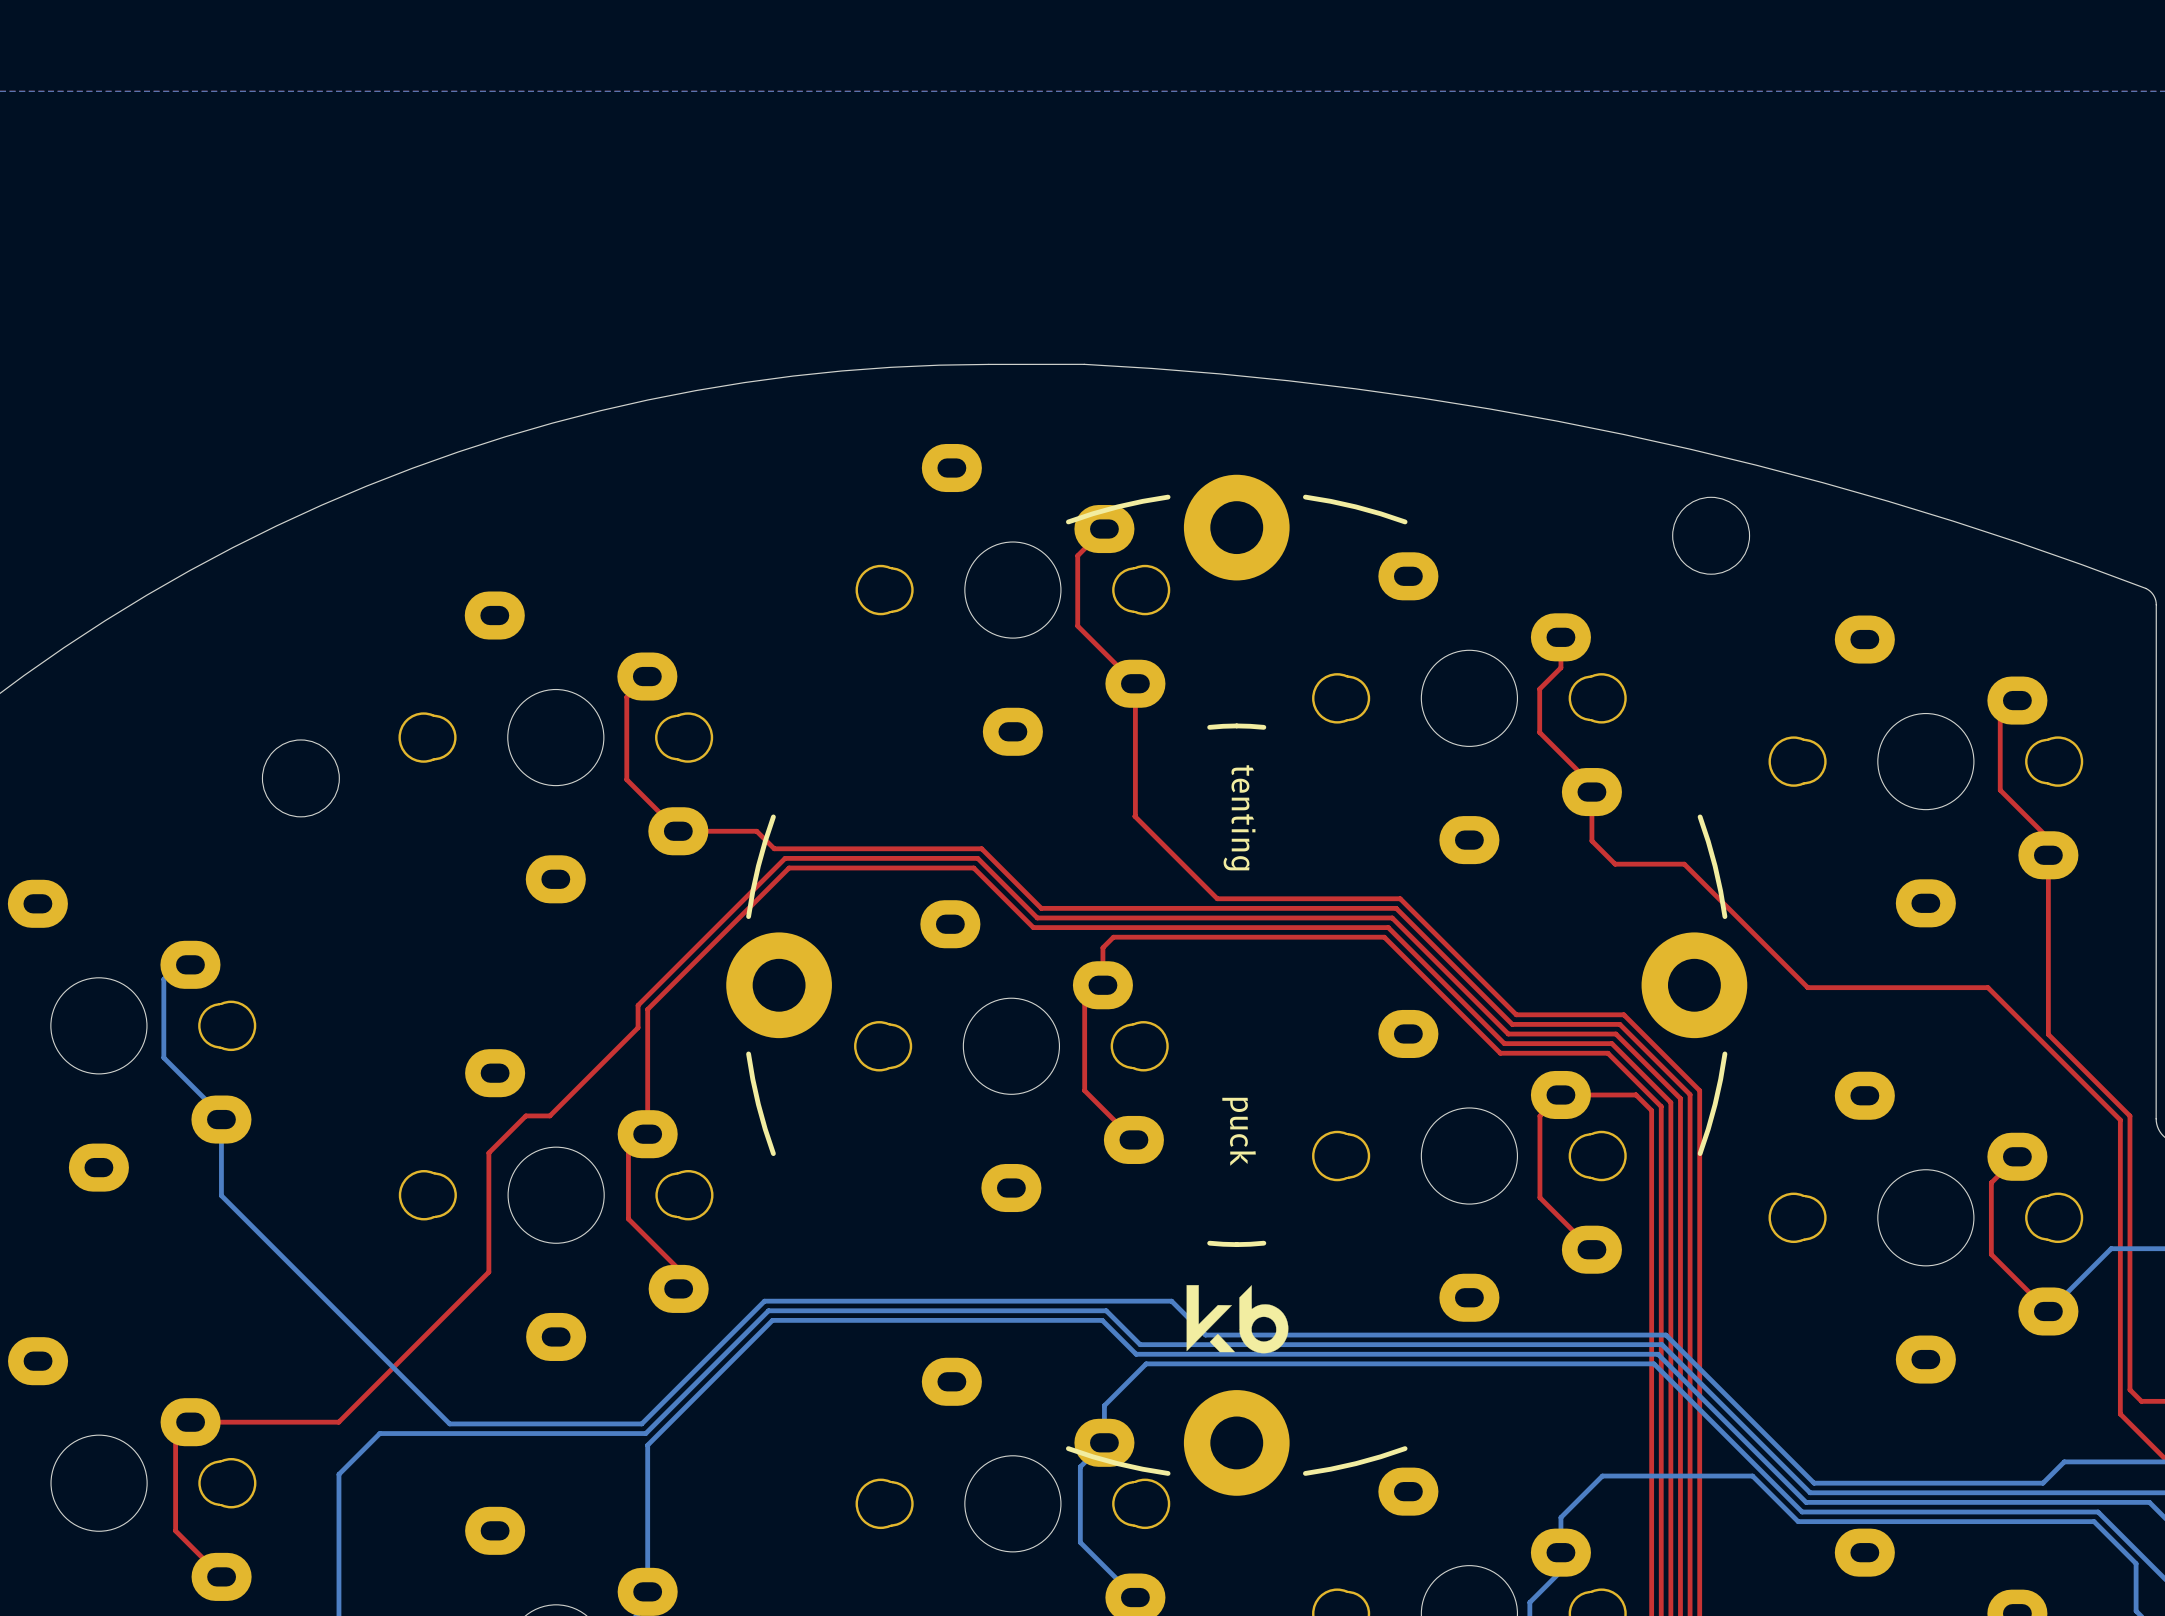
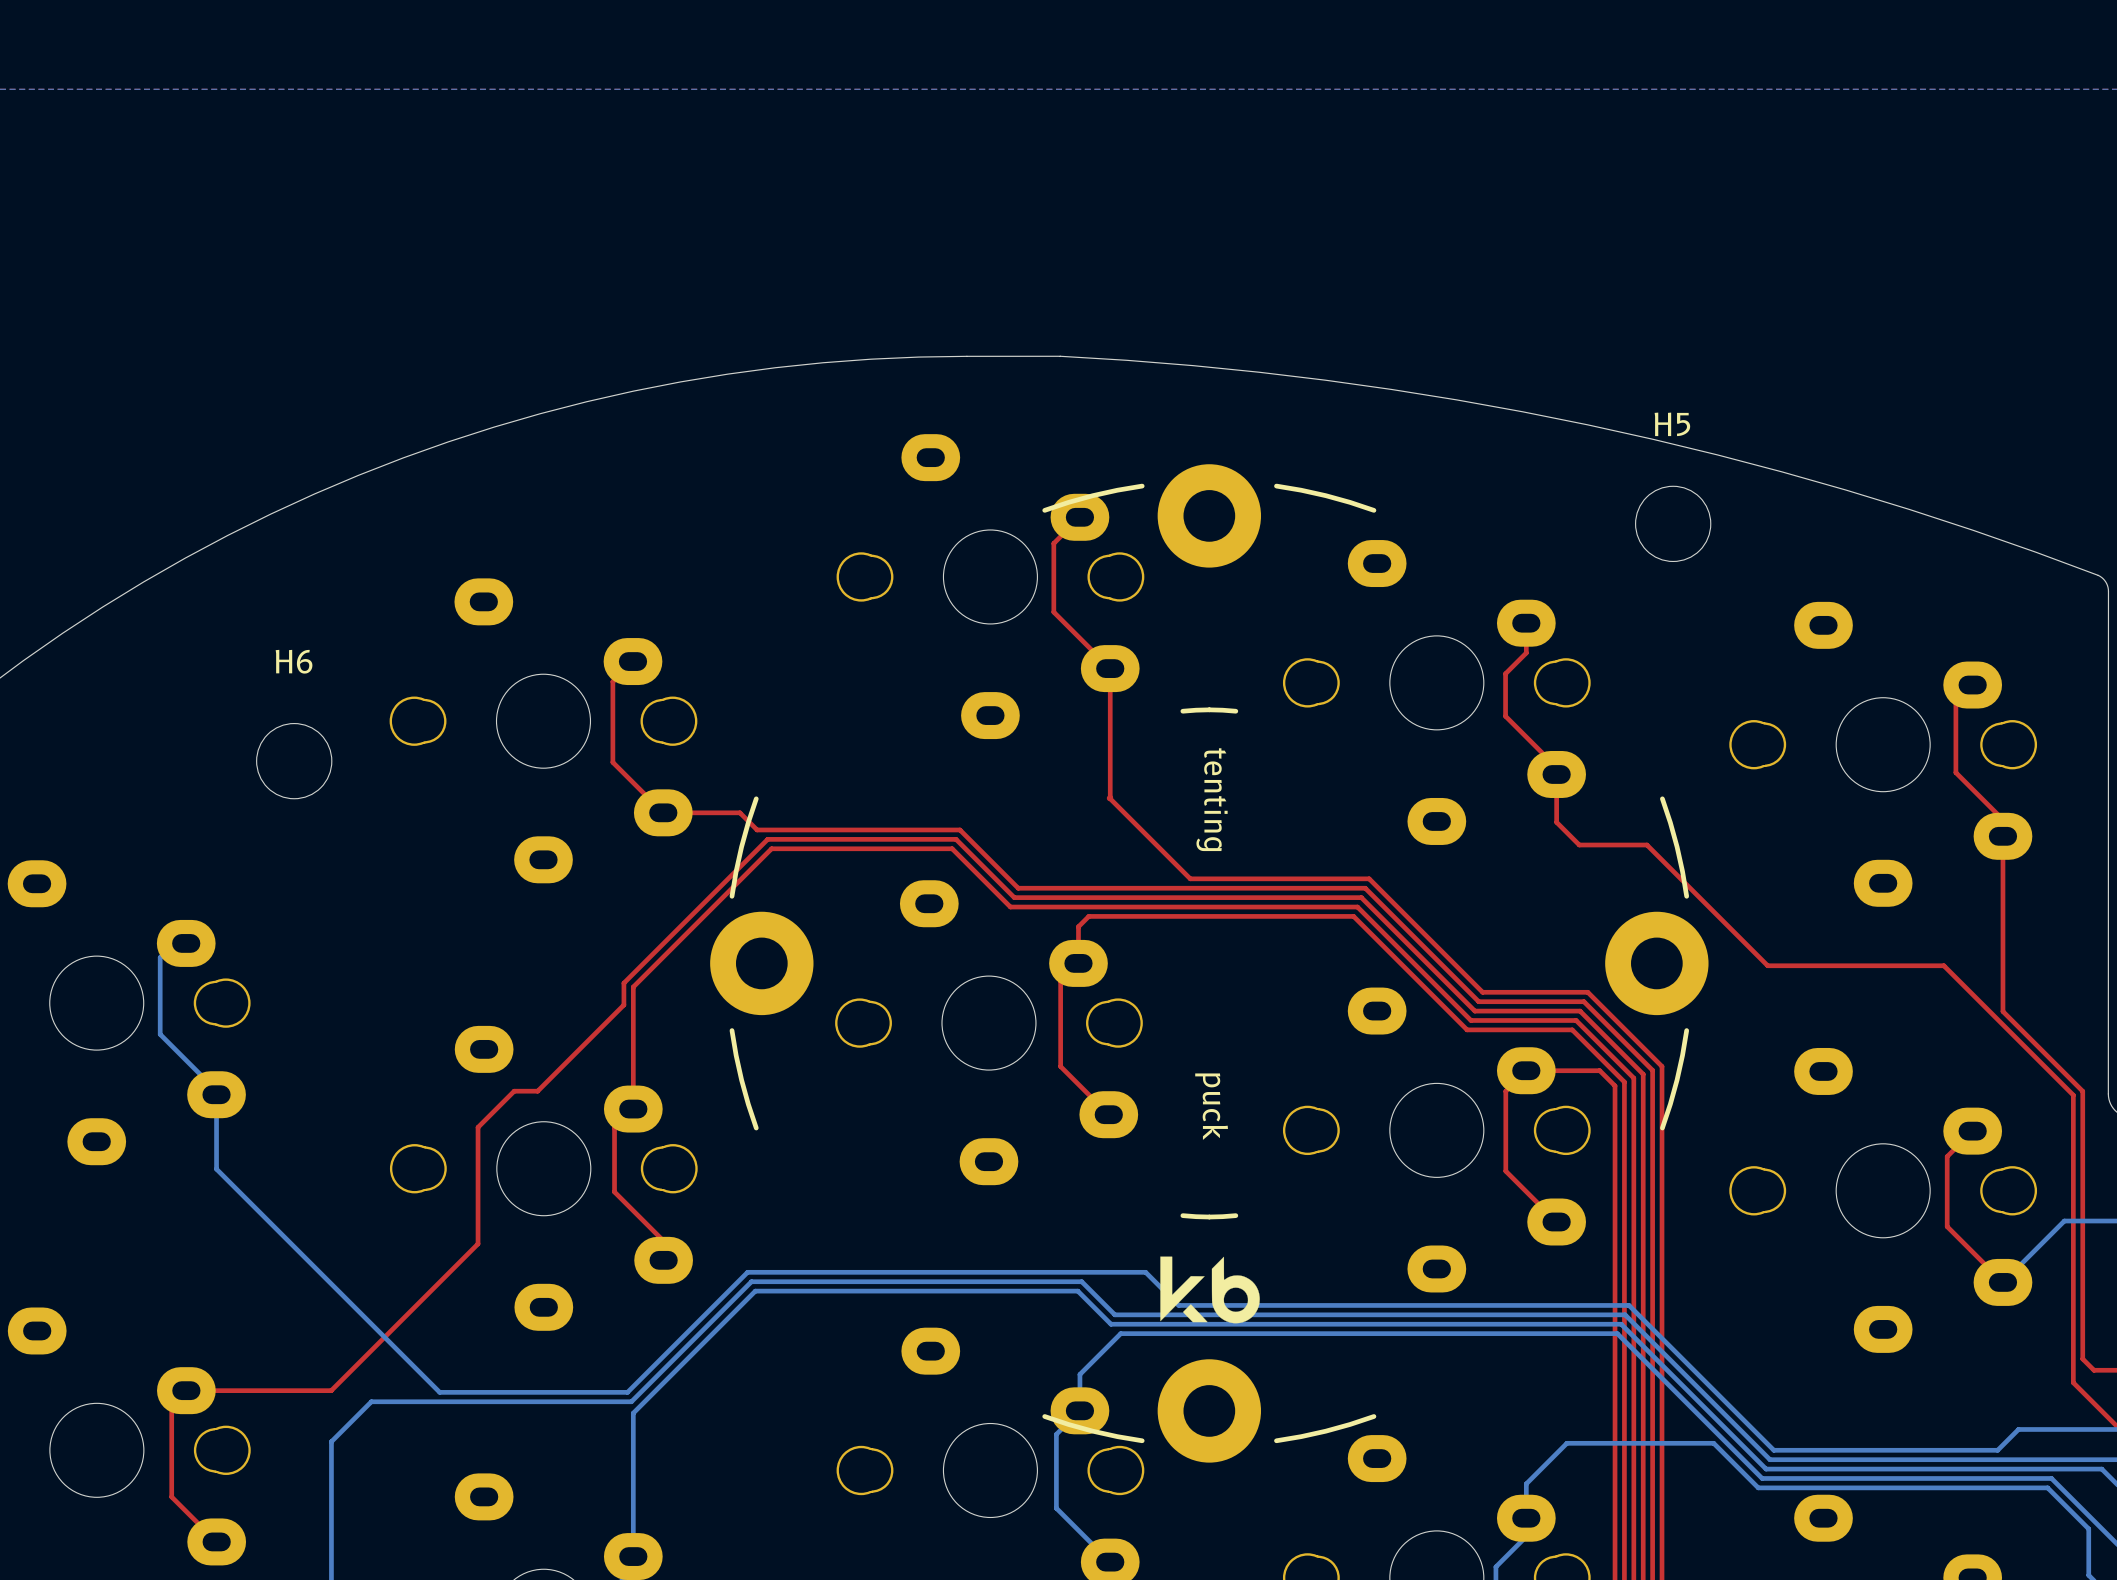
H5 name: none -> H5 (1672, 424)
H6 name: none -> H6 (294, 661)

